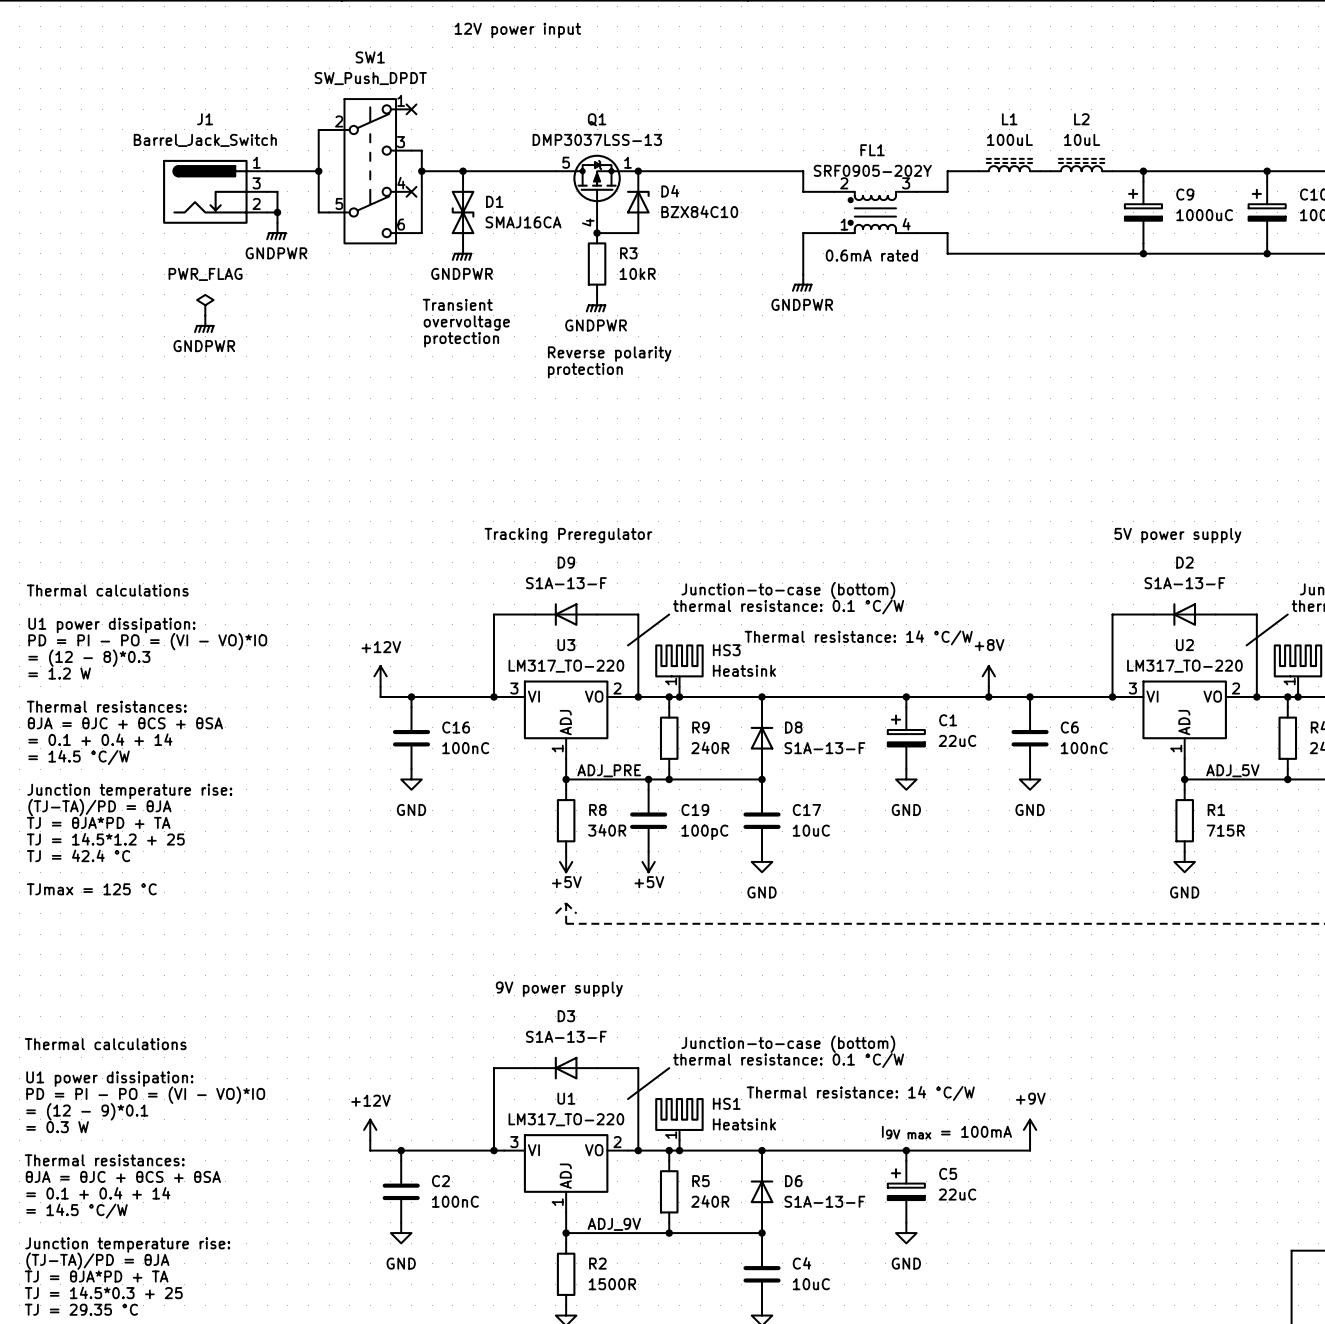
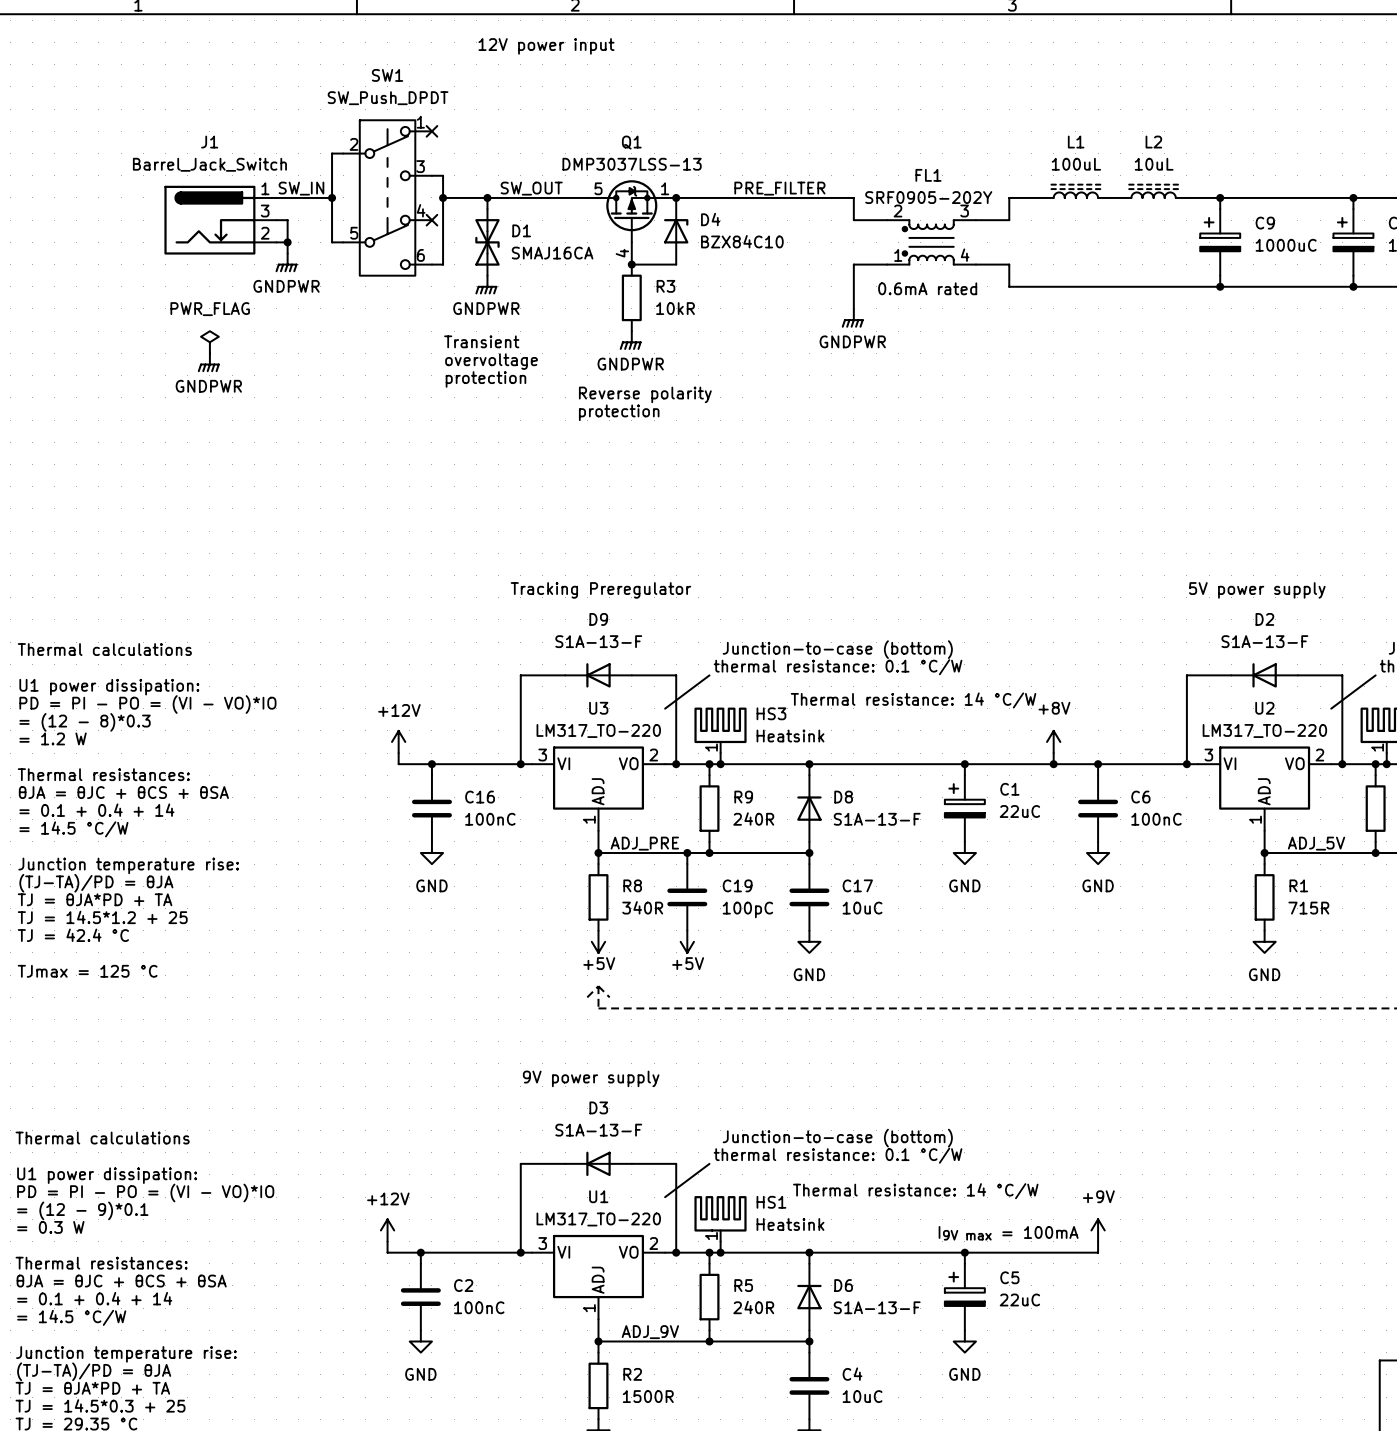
label: none -> SW_IN (301, 188)
label: none -> SW_OUT (531, 188)
label: none -> PRE_FILTER (779, 188)

